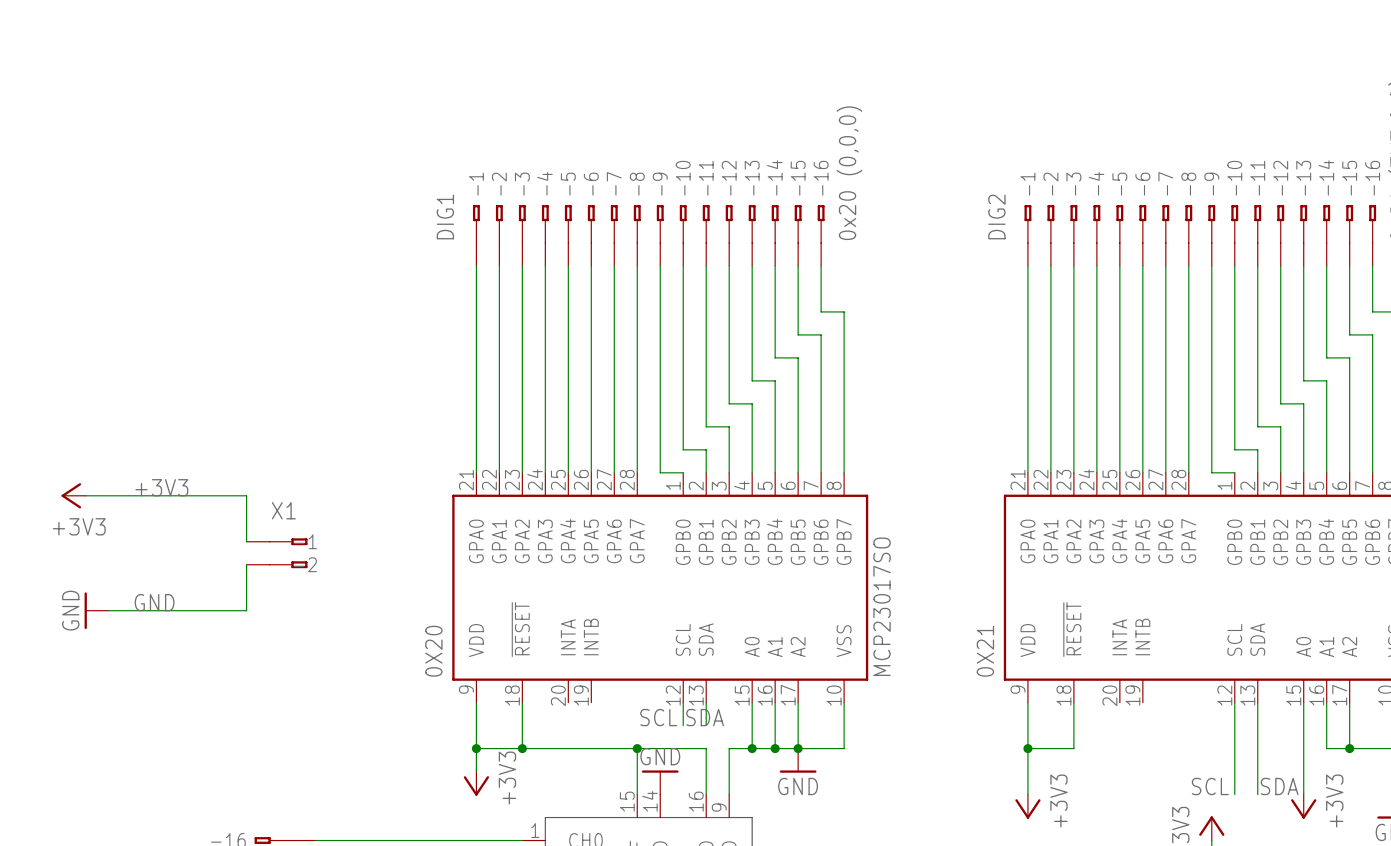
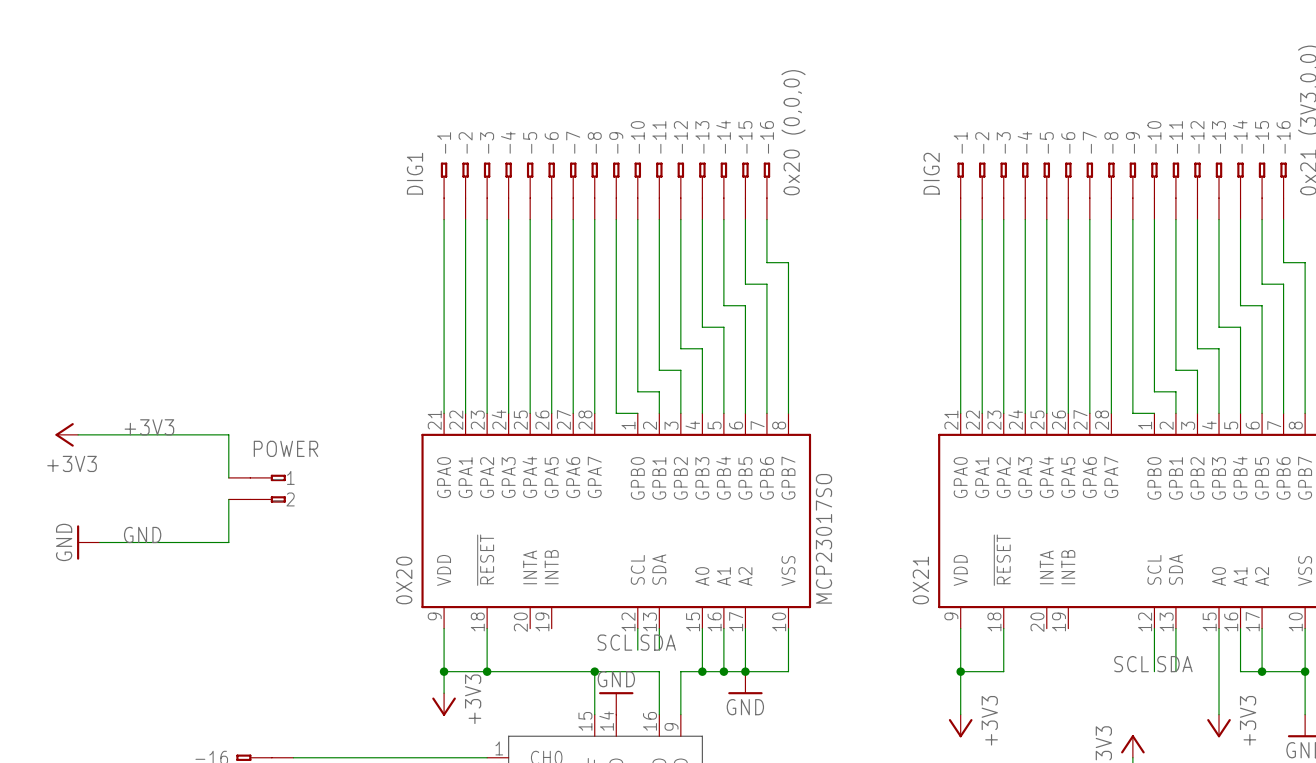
X1 name: X1 (283, 510) -> POWER (285, 448)
wire: (1234, 748) (1234, 794) -> none
wire: (1257, 748) (1257, 794) -> none
label position: SCL (1210, 786) -> SCL (1131, 664)
label position: SDA (1279, 786) -> SDA (1174, 664)

